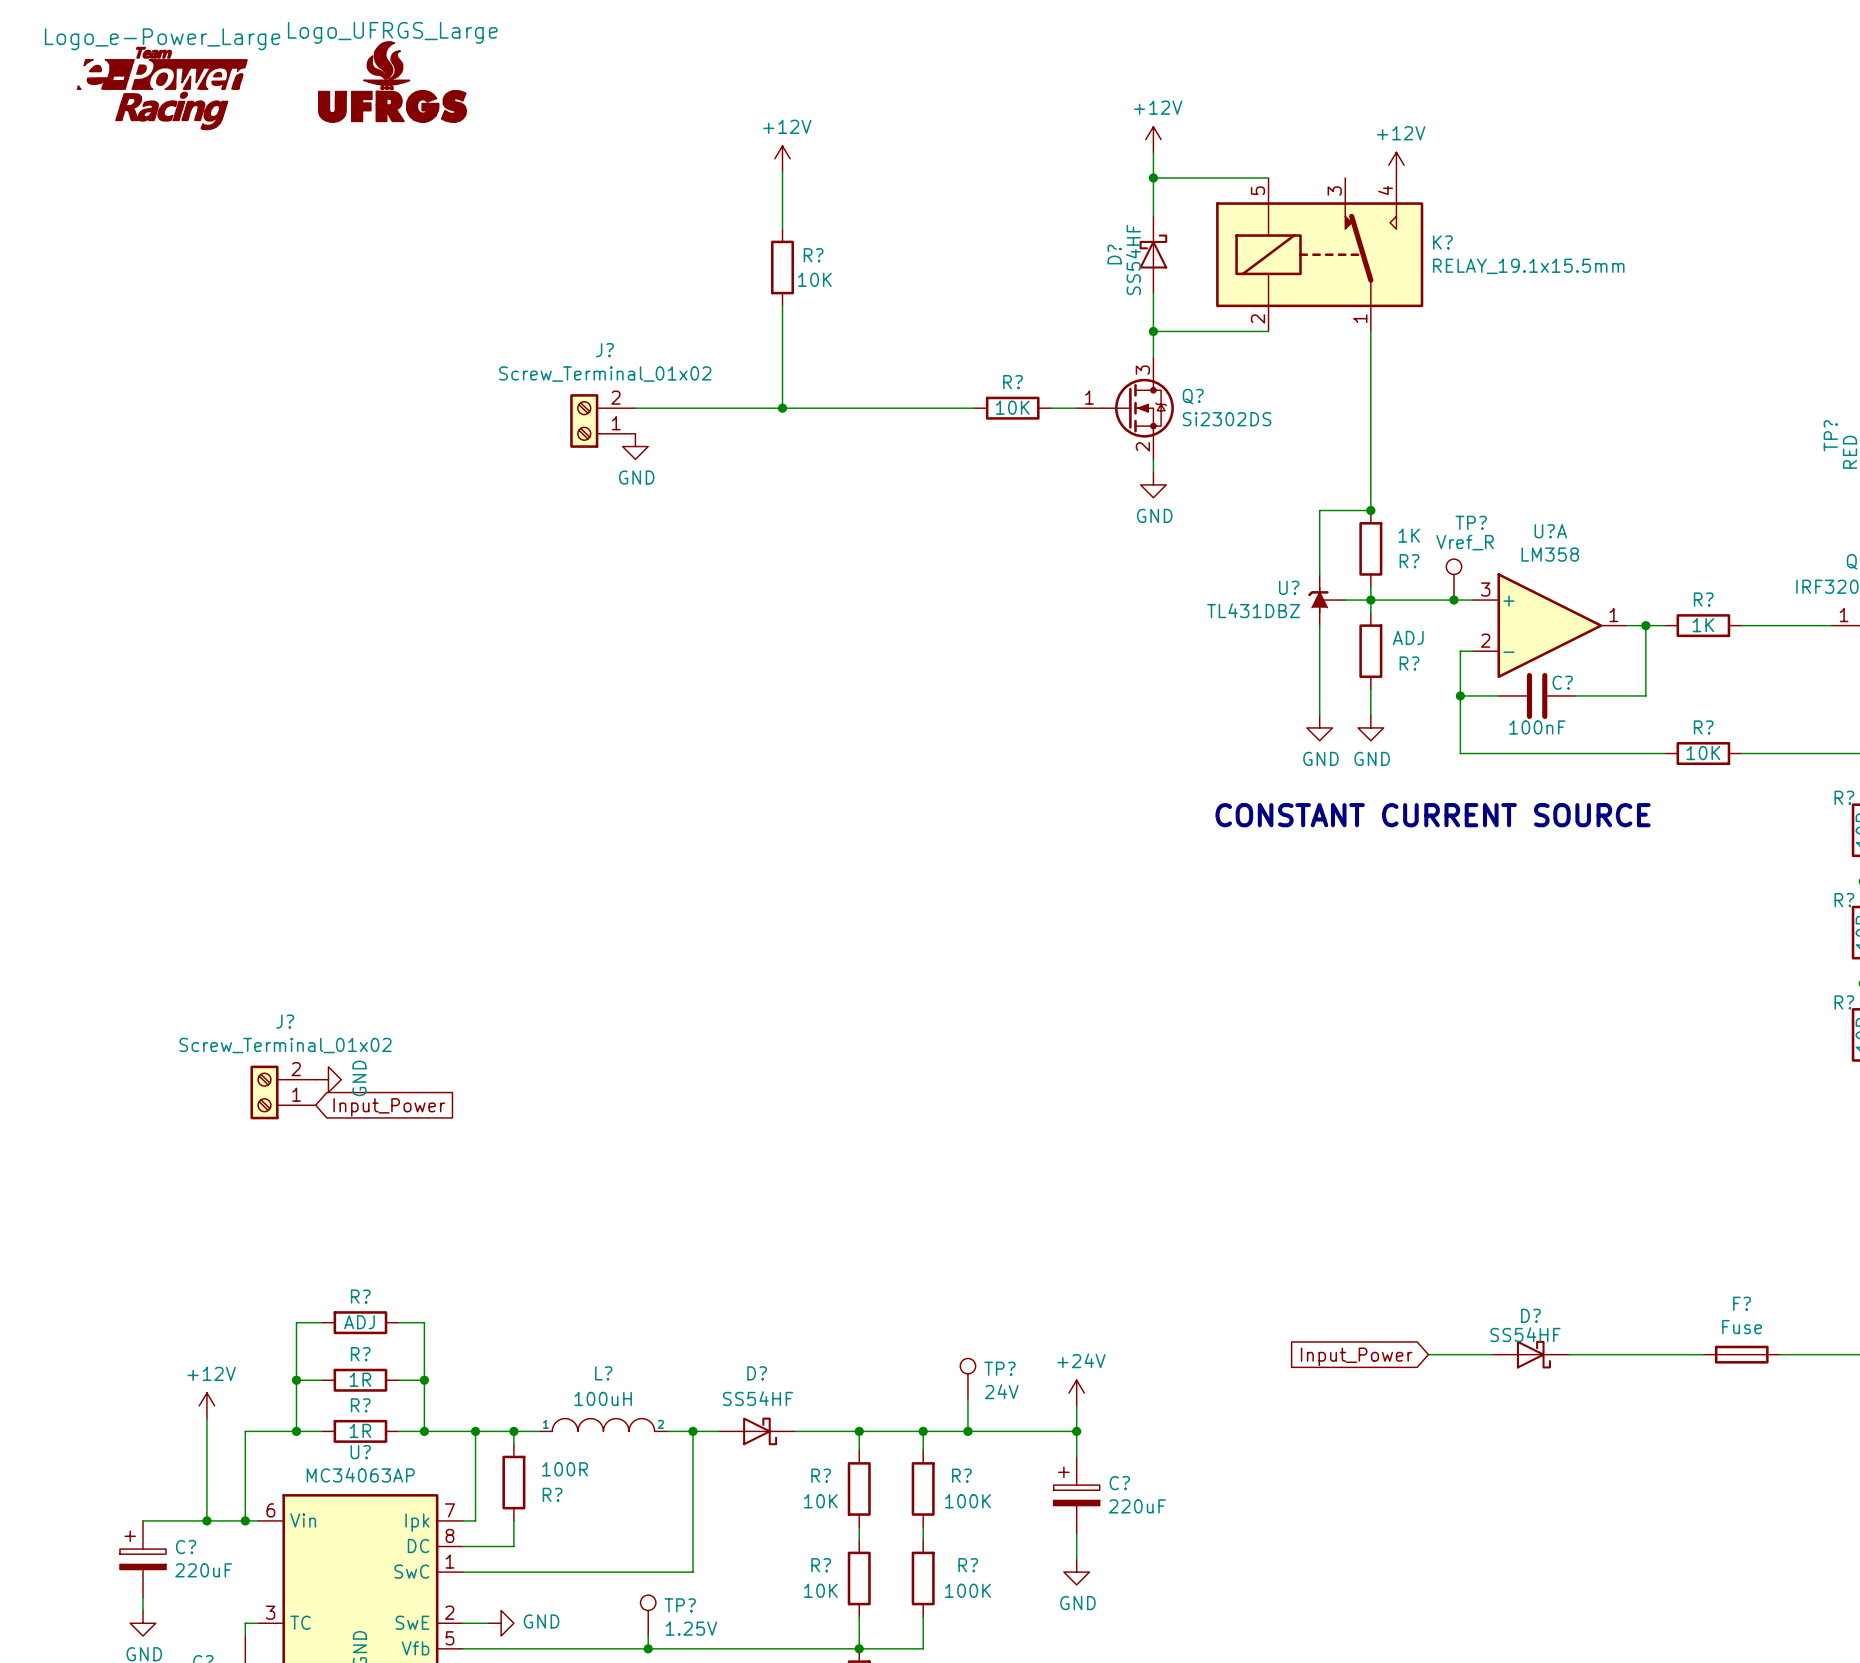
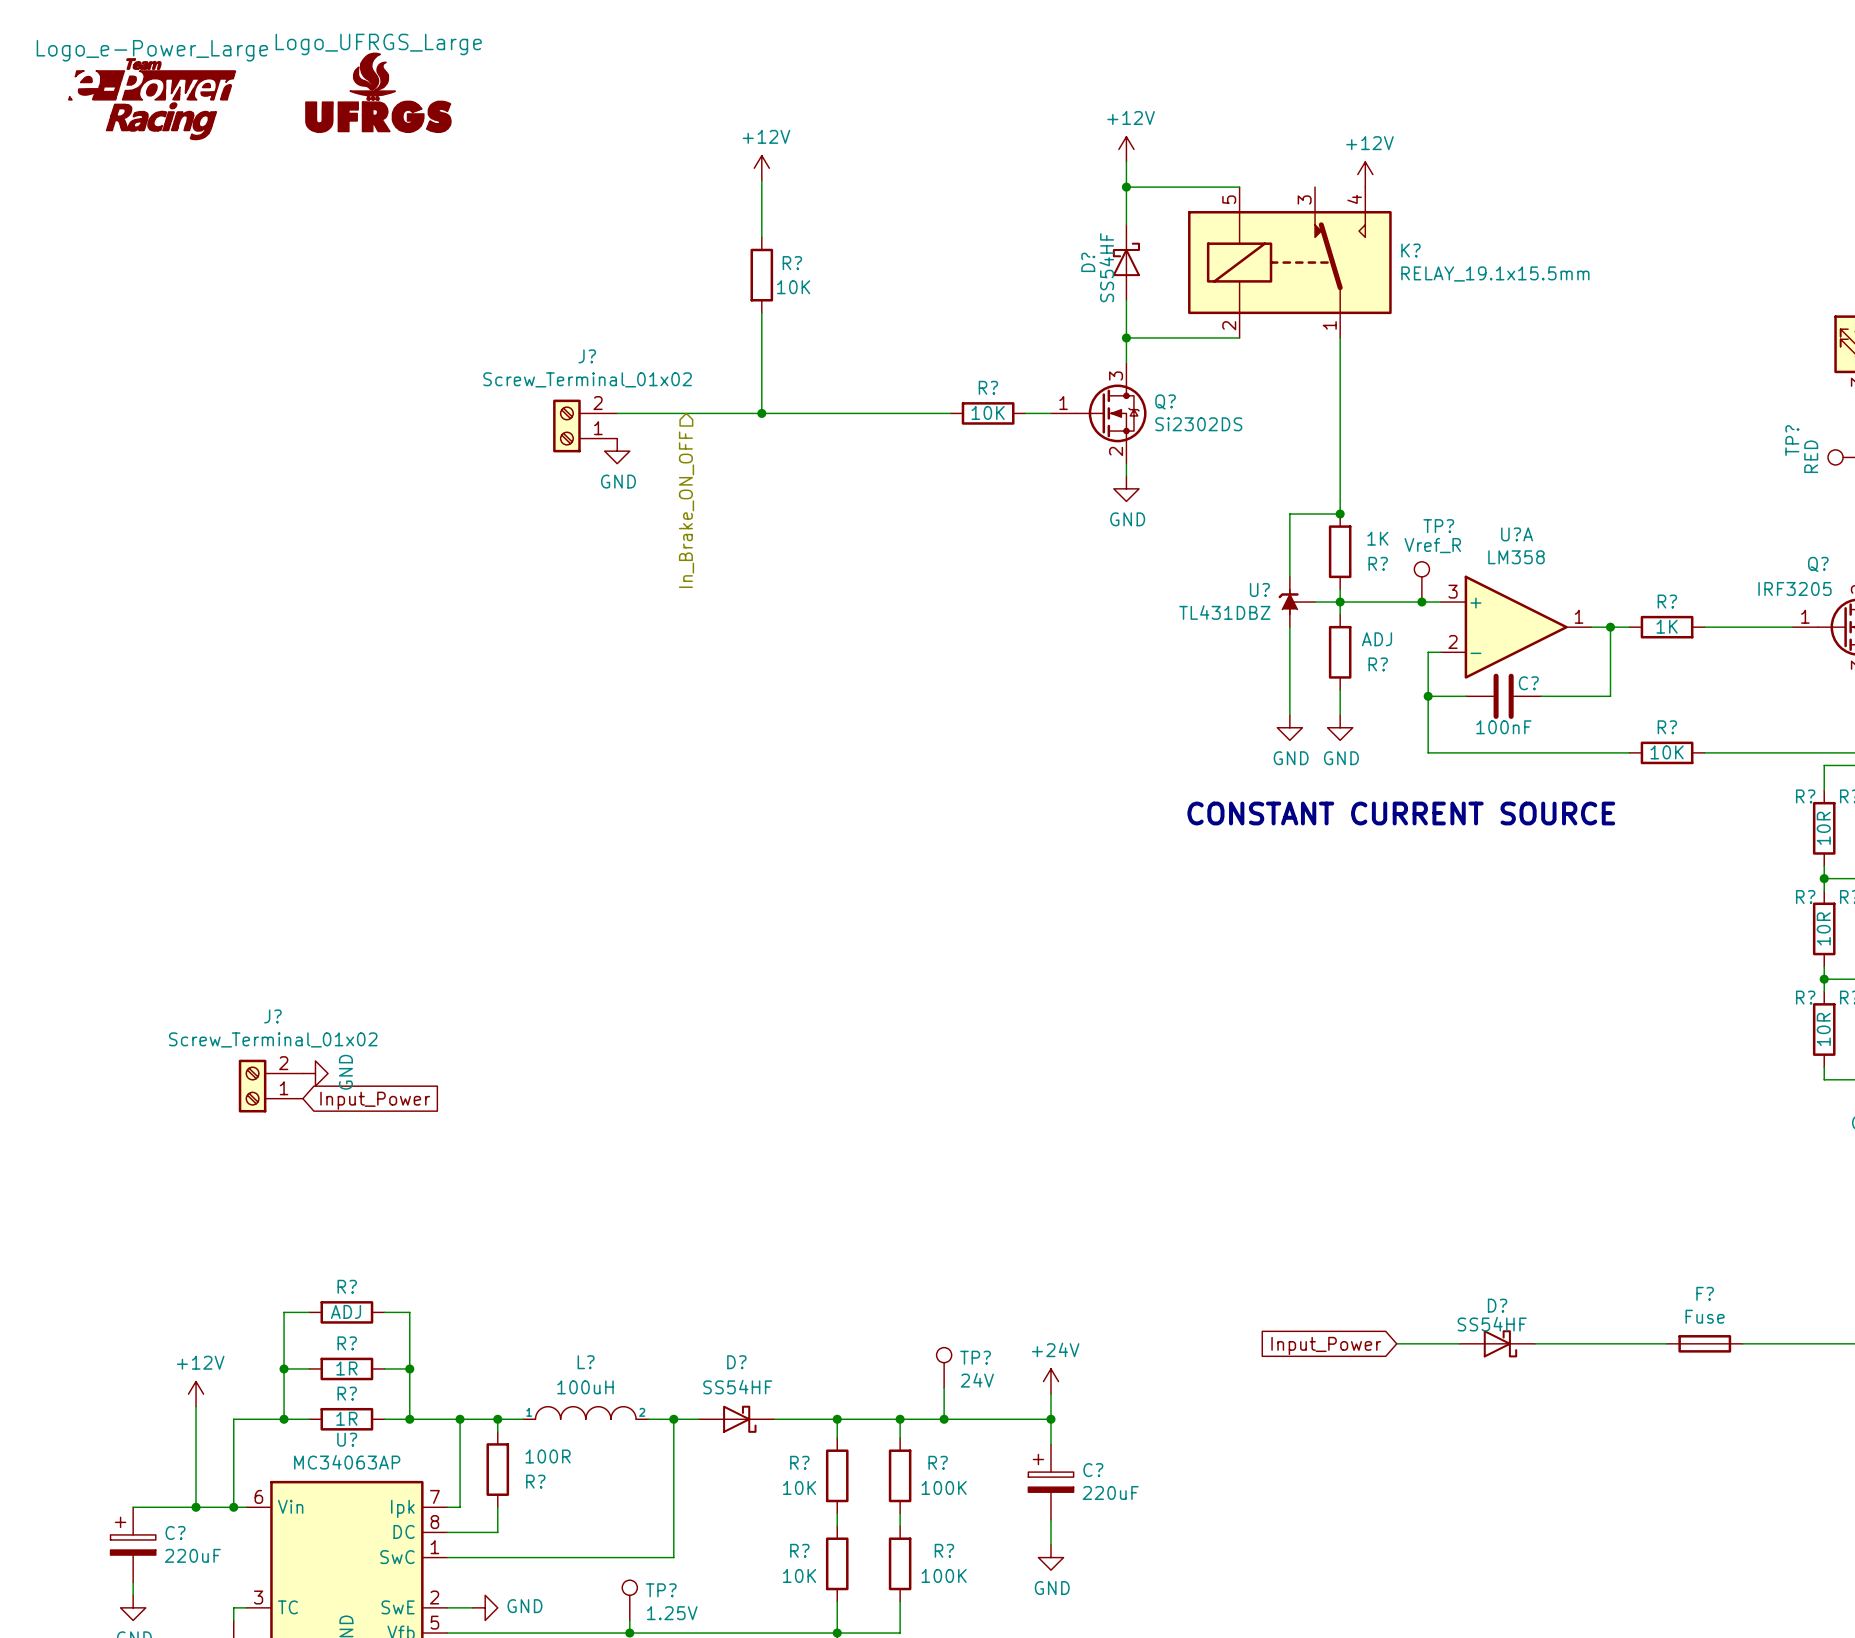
hierarchical label: none -> In_Brake_ON_OFF (686, 509)

